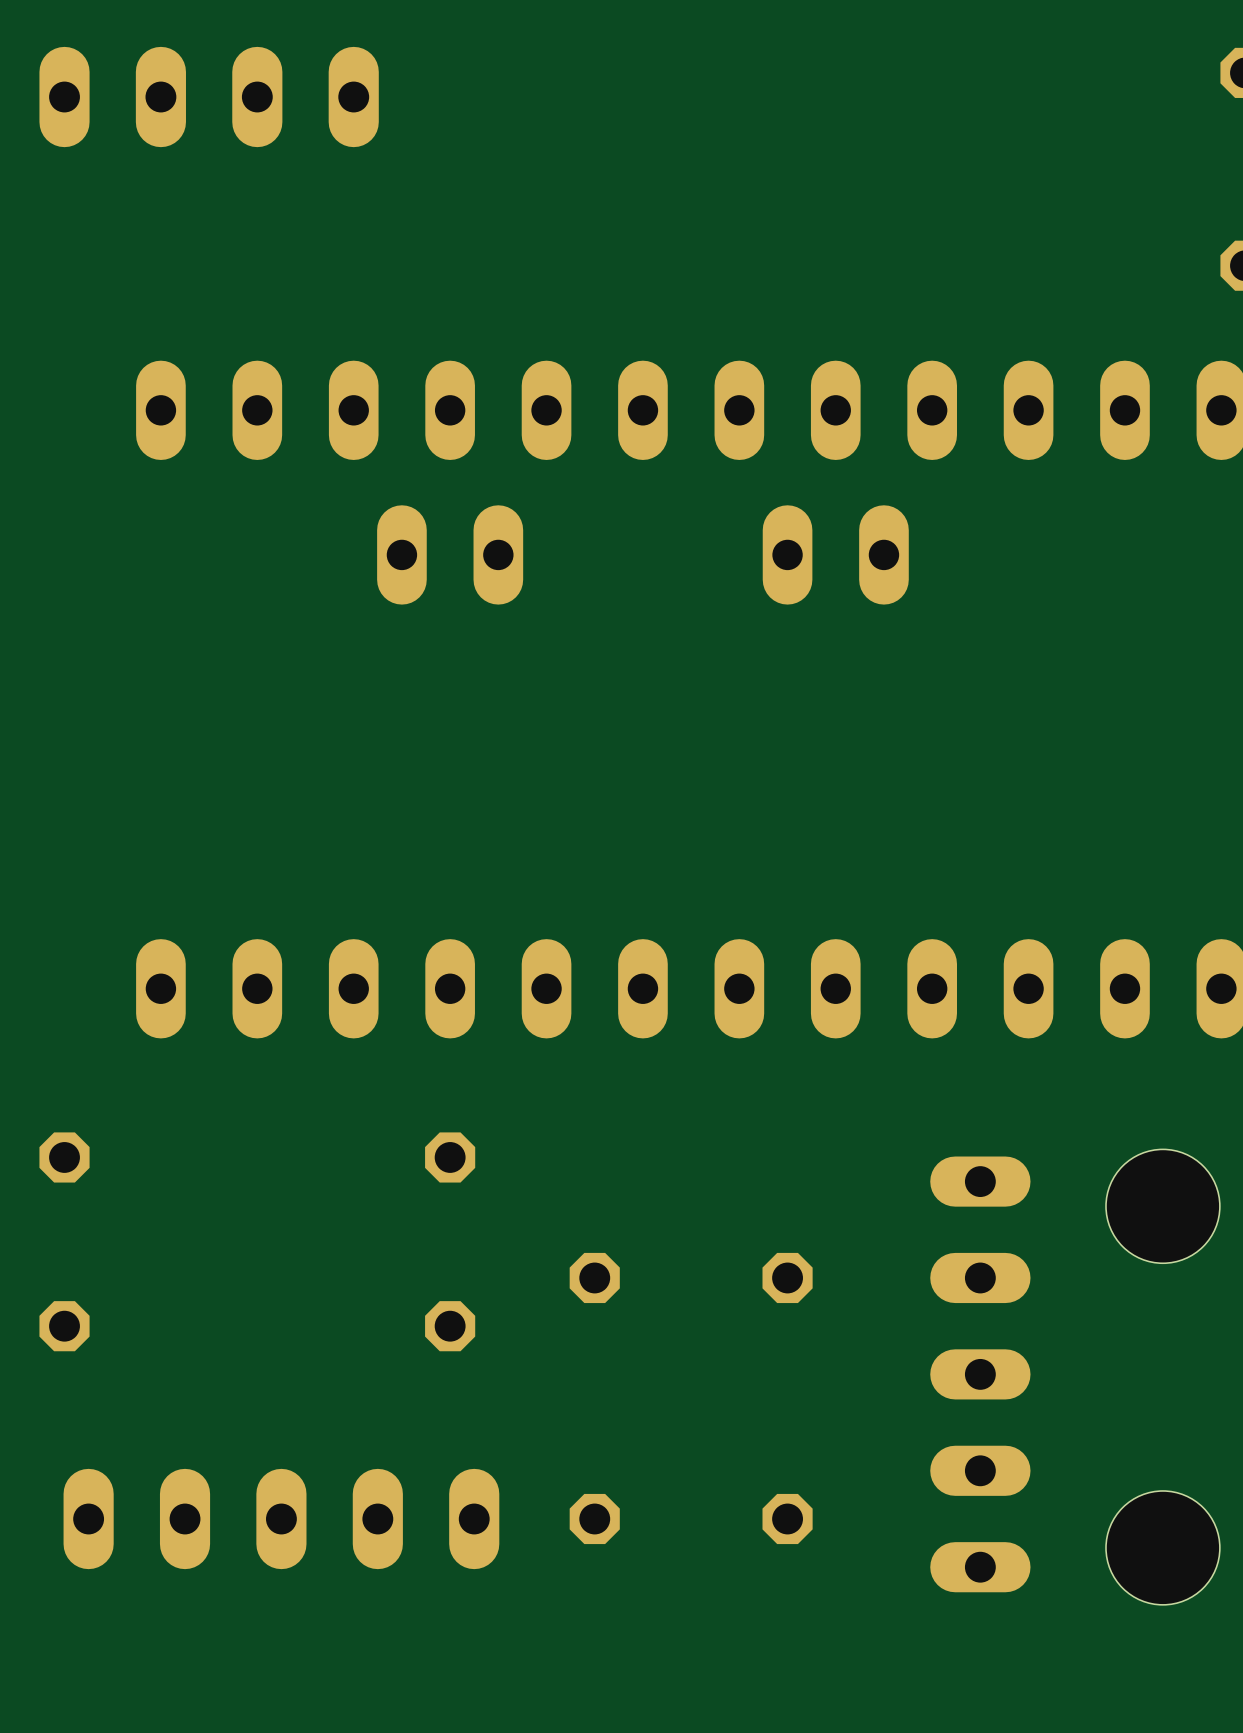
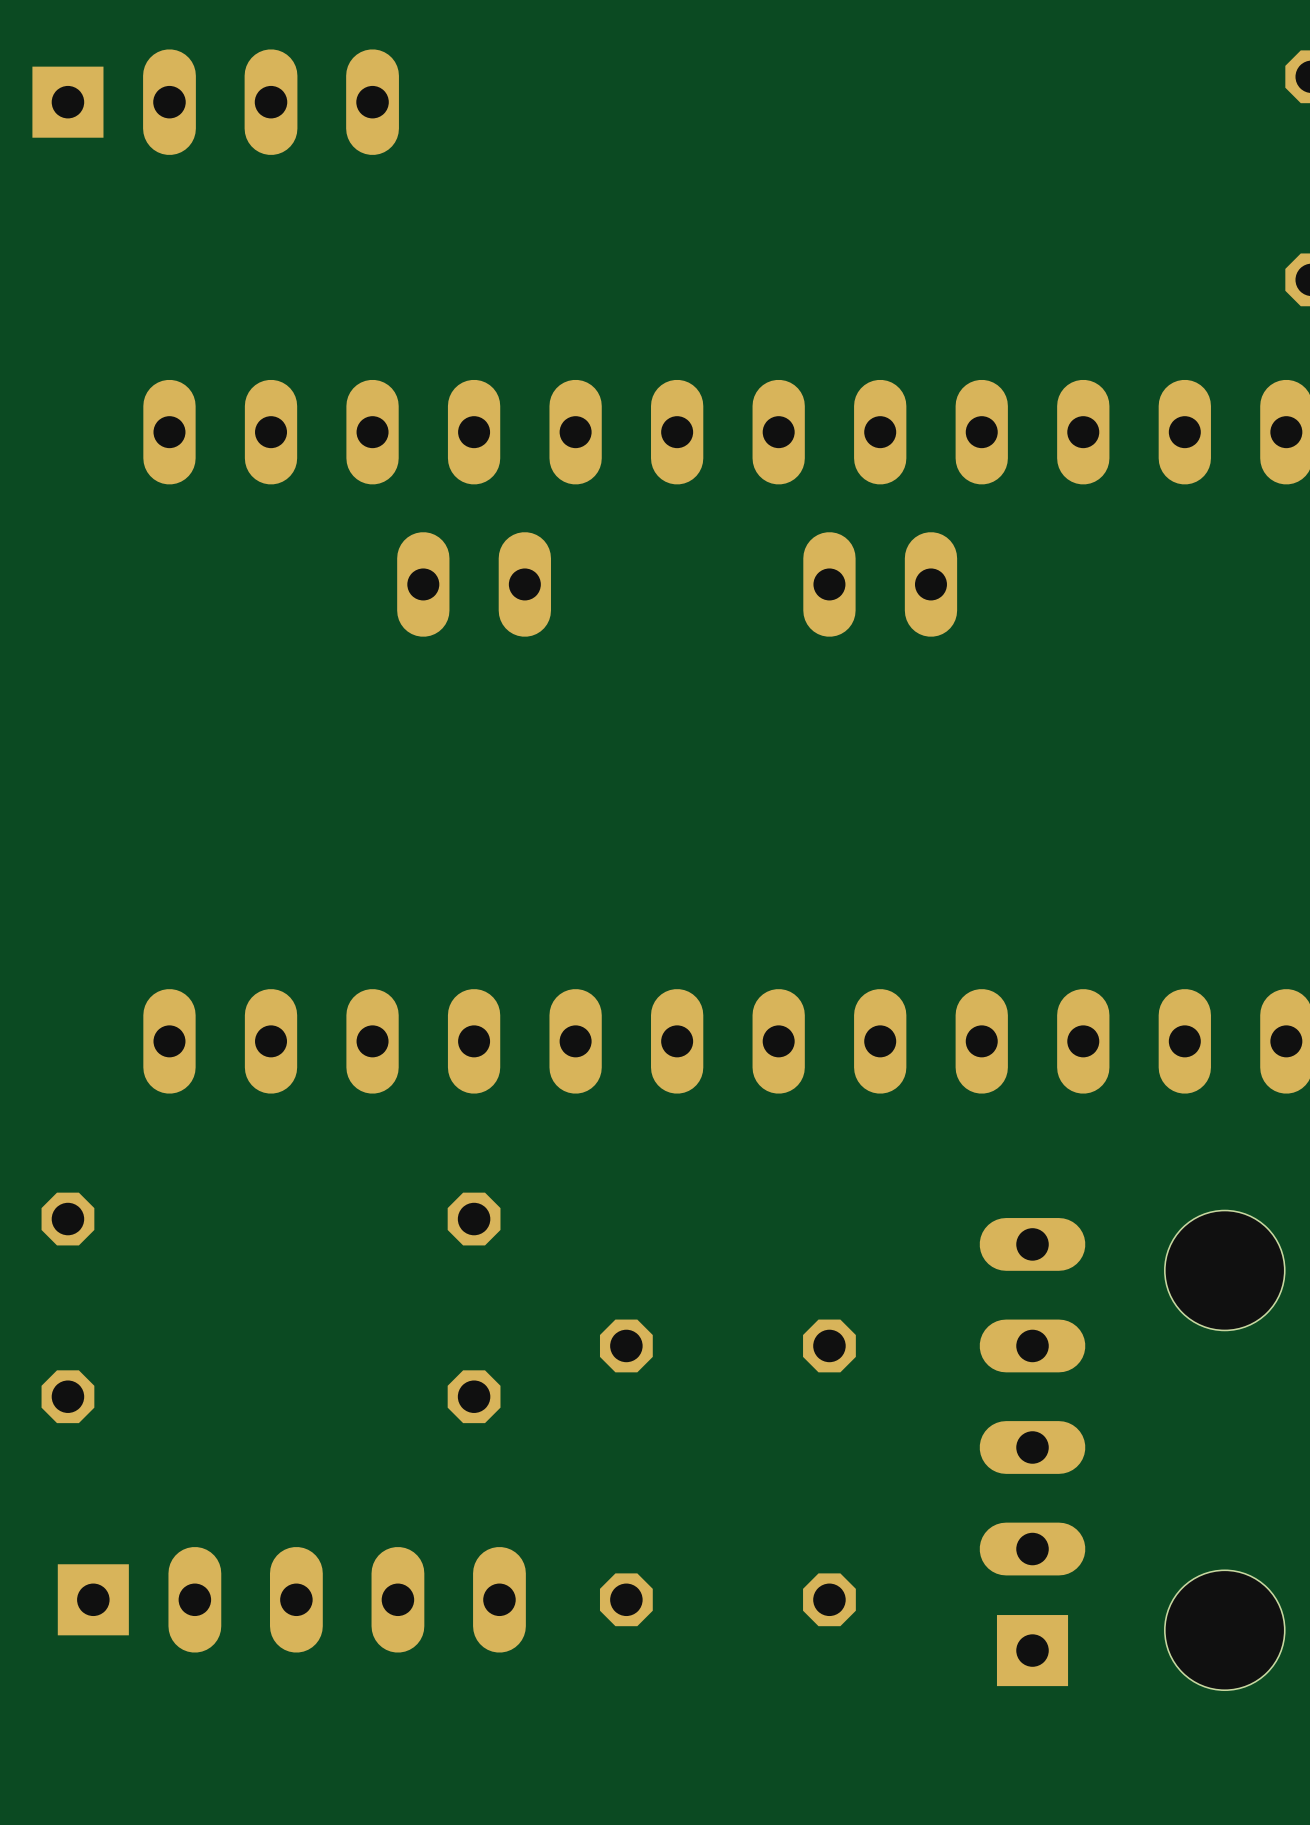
part footprint: [39, 46, 379, 148] -> [32, 49, 399, 155]
part footprint: [930, 1149, 1220, 1605] -> [979, 1210, 1285, 1691]
part footprint: [63, 1468, 500, 1570] -> [57, 1546, 526, 1653]

